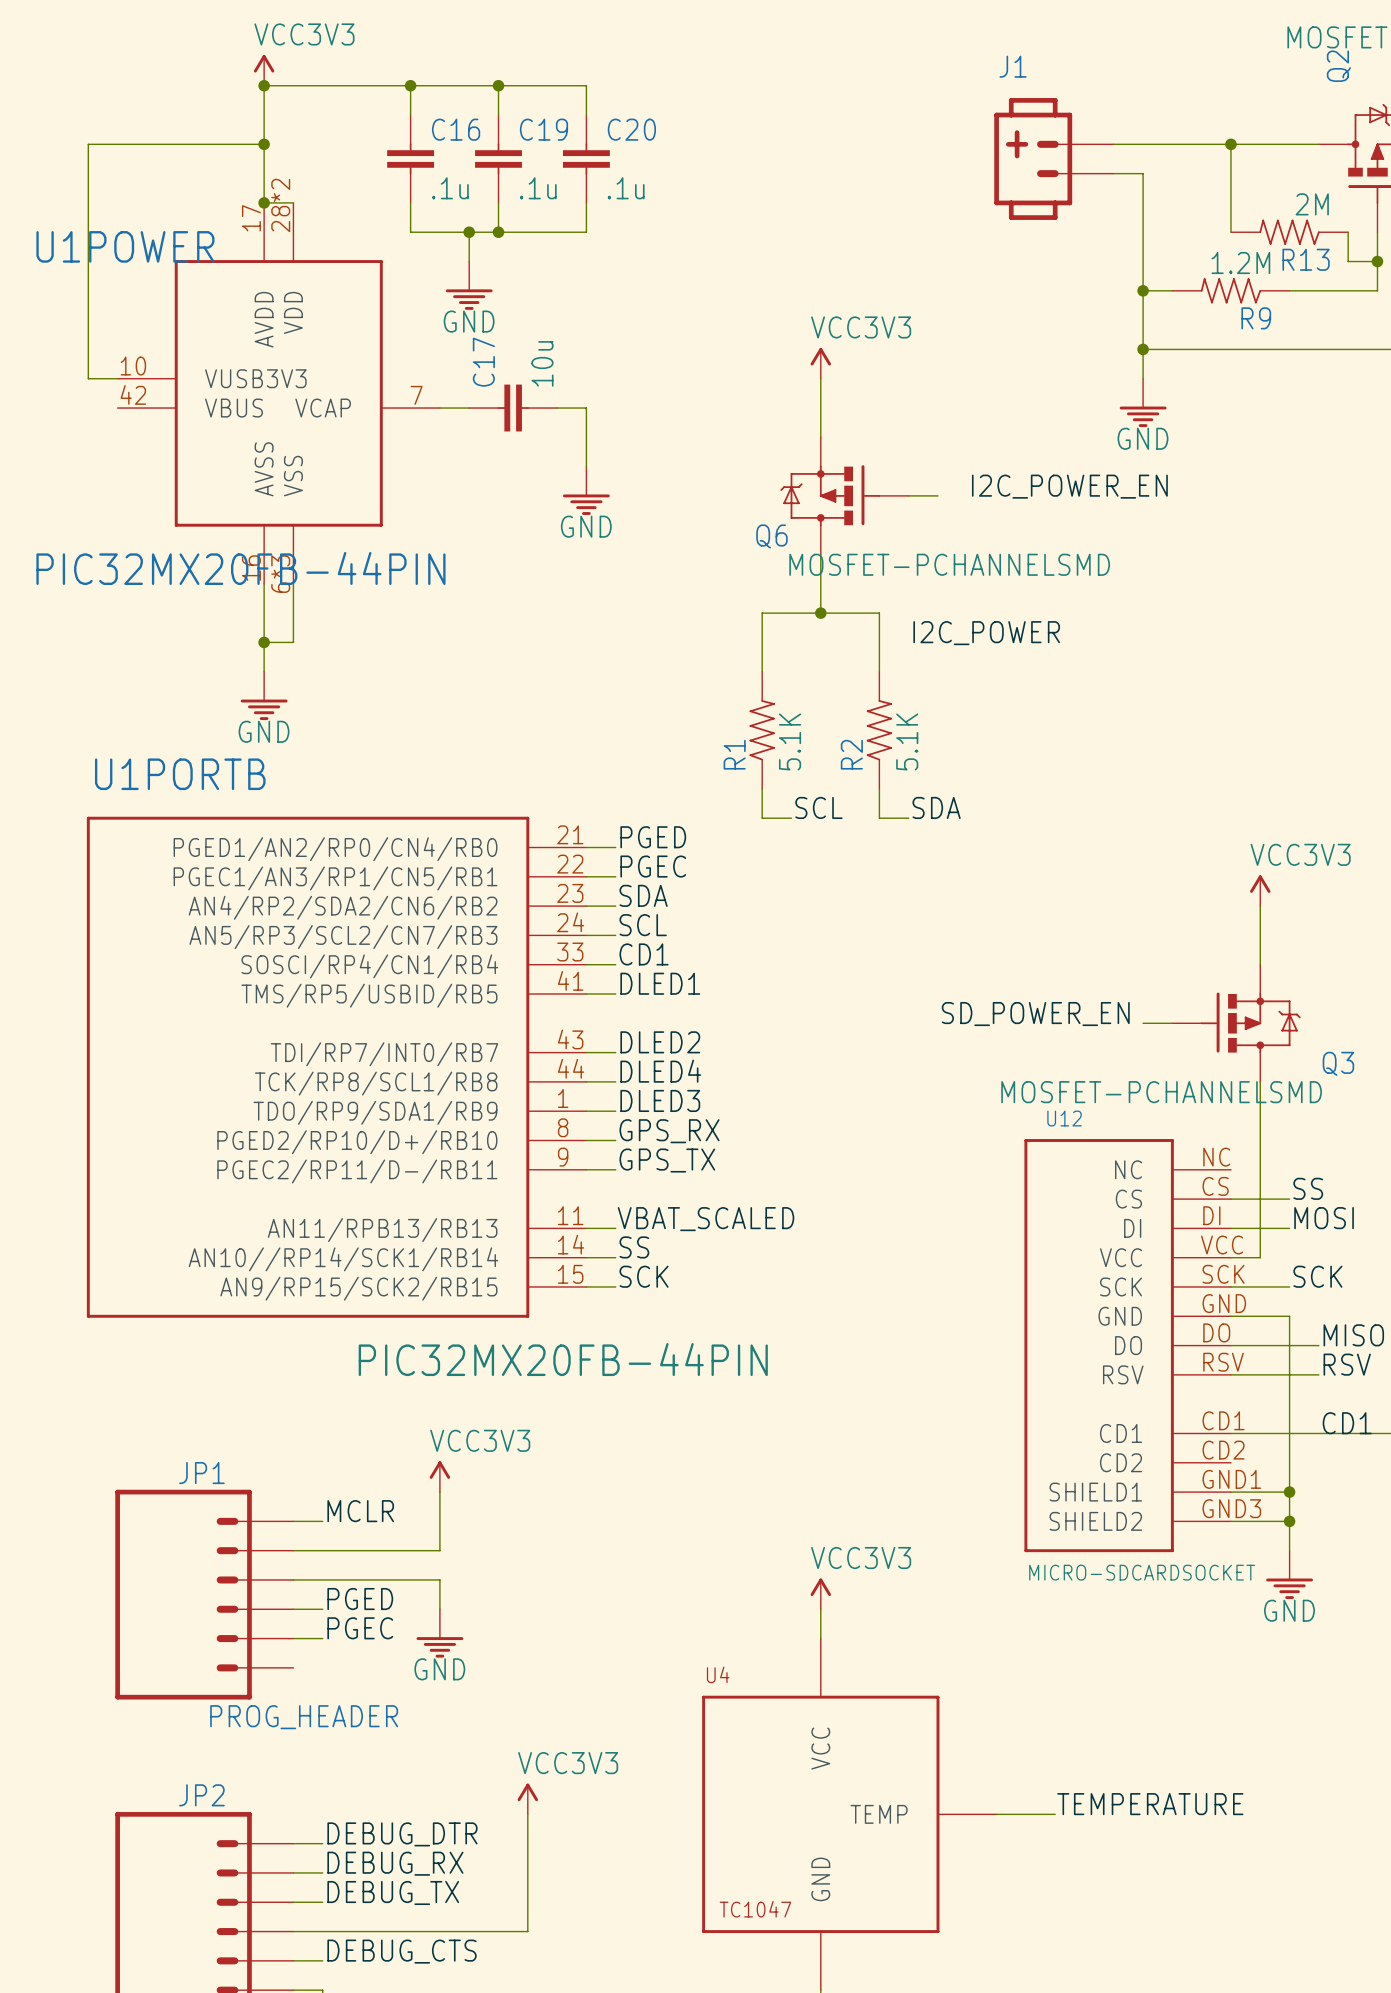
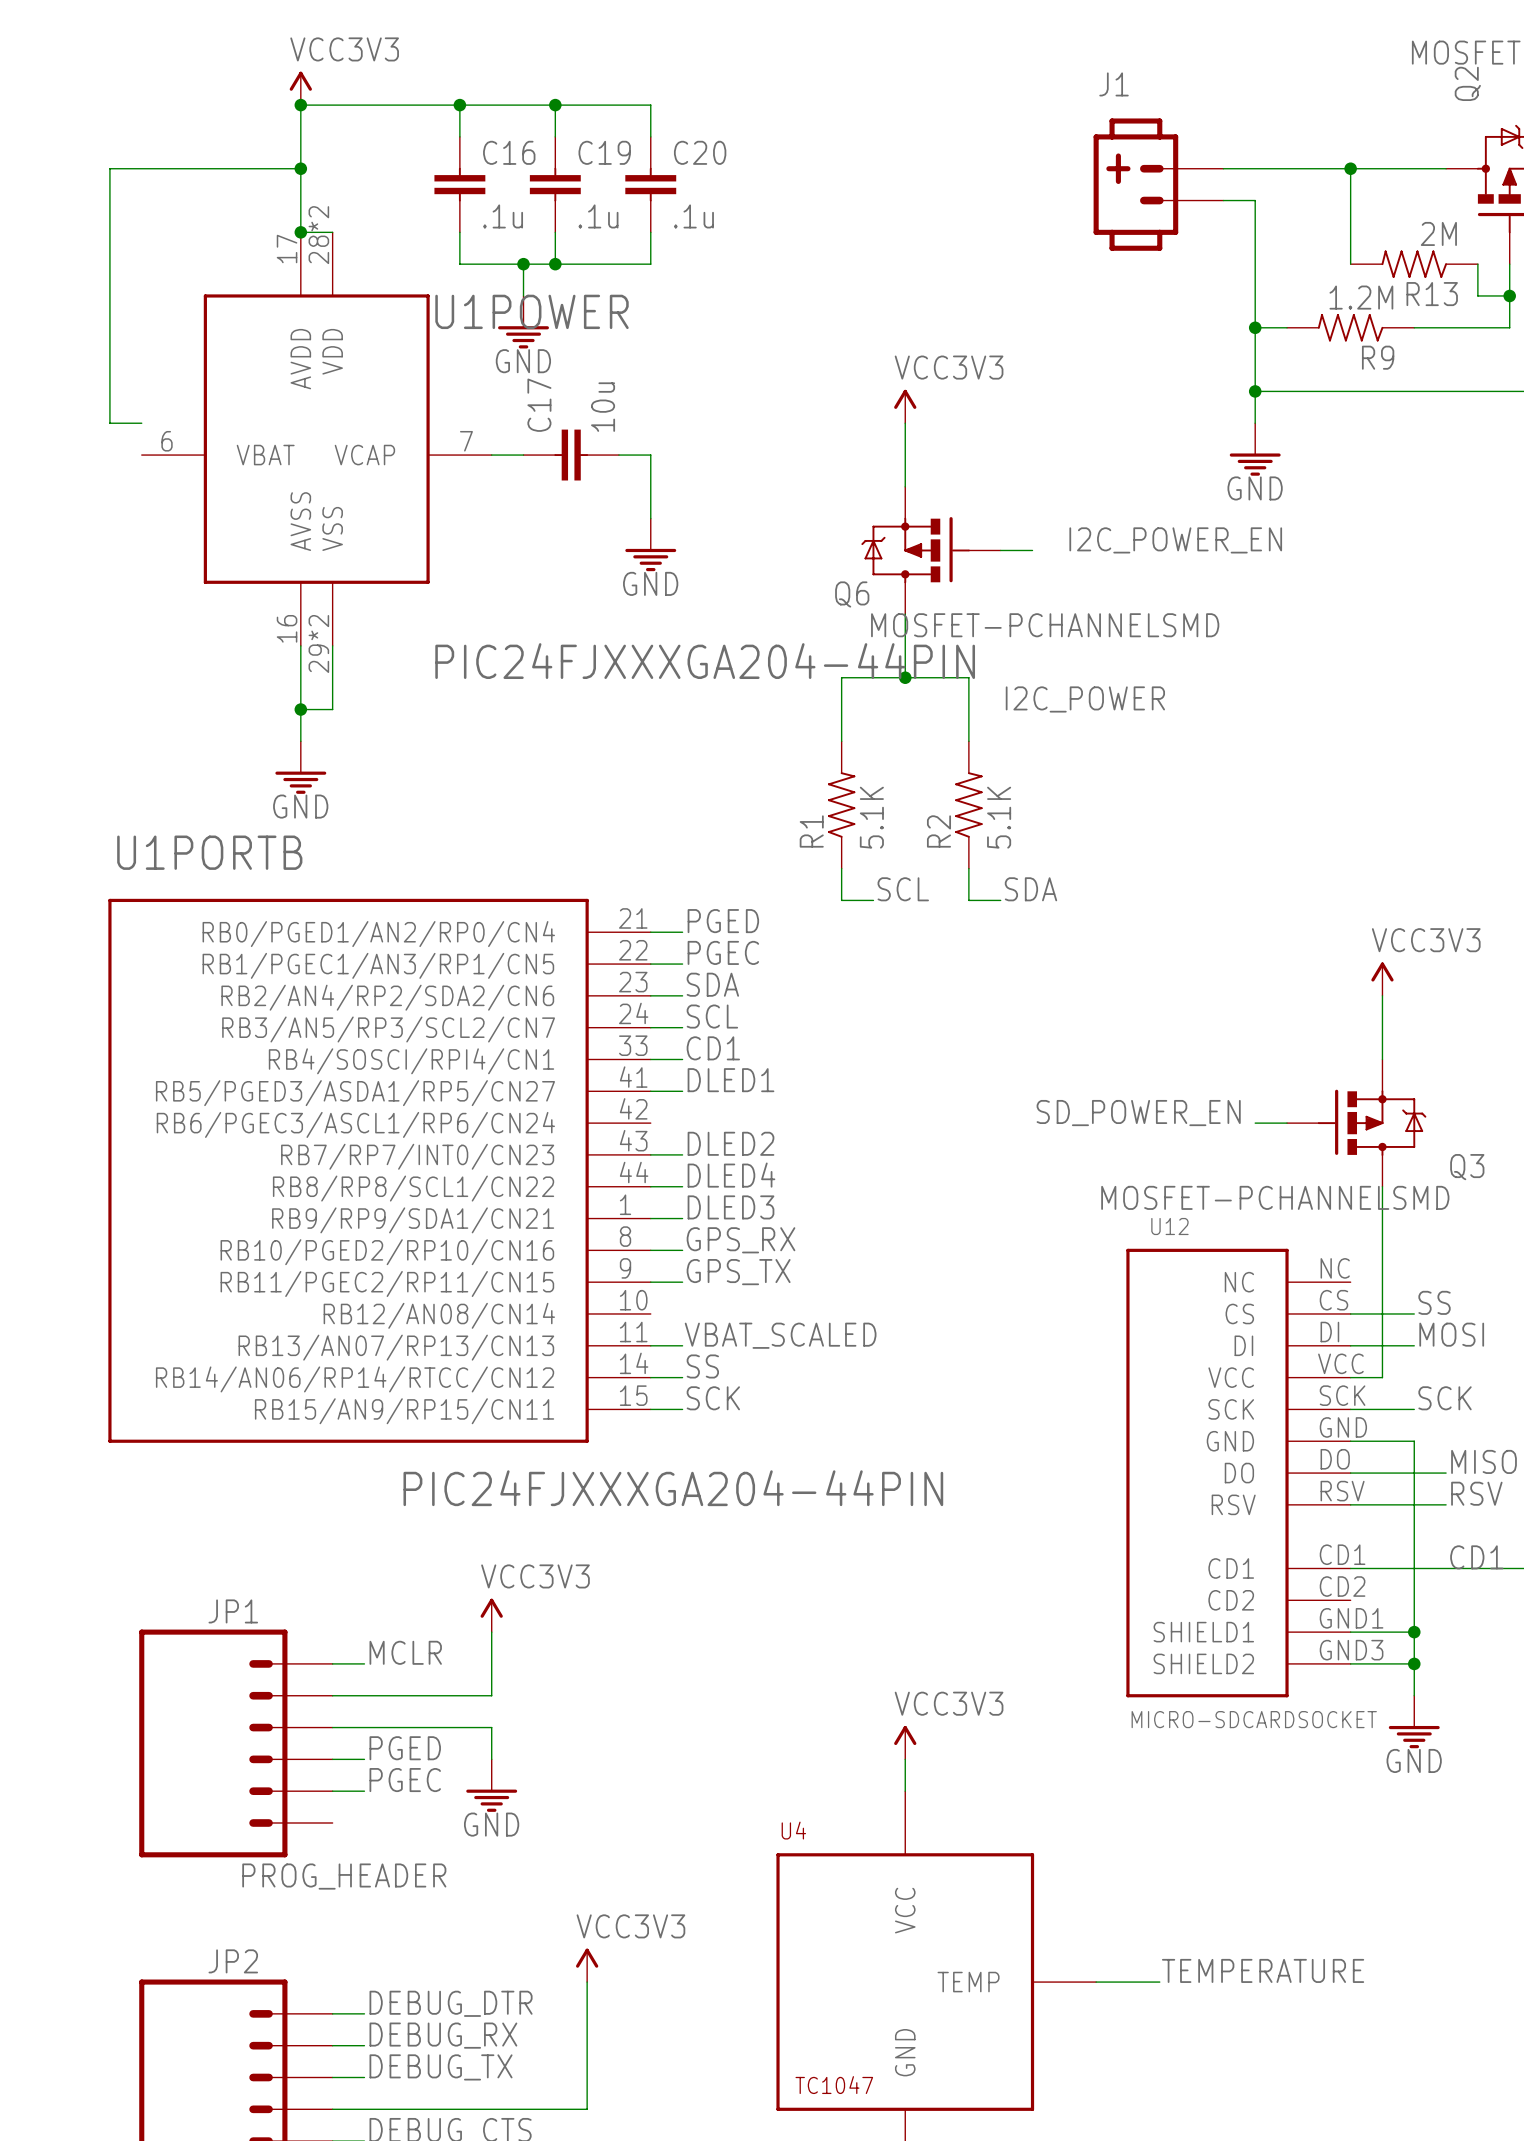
U1POWER symbol: [117, 202, 440, 584] -> [141, 232, 492, 646]
U1POWER name position: U1POWER (125, 246) -> U1POWER (532, 311)
U1POWER value: PIC32MX20FB-44PIN (240, 568) -> PIC24FJXXXGA204-44PIN (705, 661)
U1PORTB symbol: [86, 816, 587, 1318] -> [108, 898, 651, 1443]
U1PORTB value: PIC32MX20FB-44PIN (563, 1359) -> PIC24FJXXXGA204-44PIN (673, 1488)

